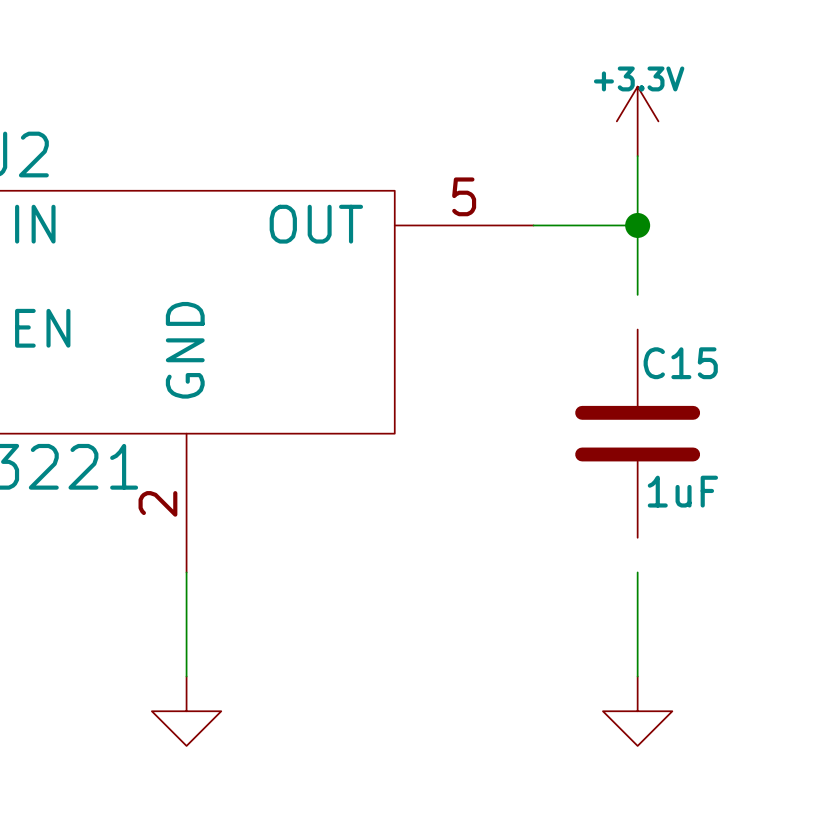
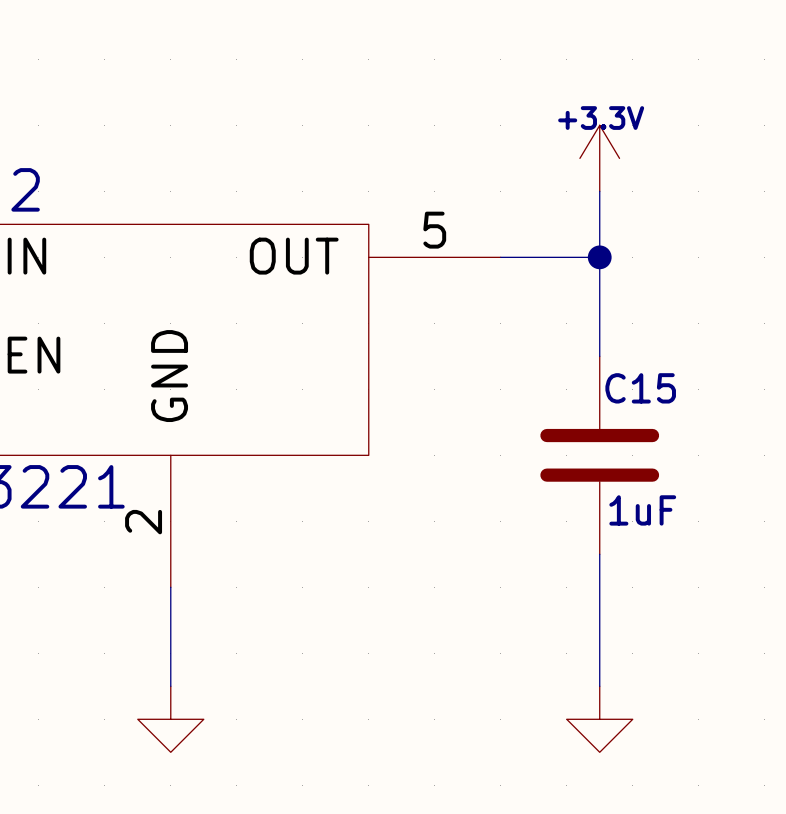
wire: none -> (599, 323) (599, 356)
wire: none -> (599, 554) (599, 587)

